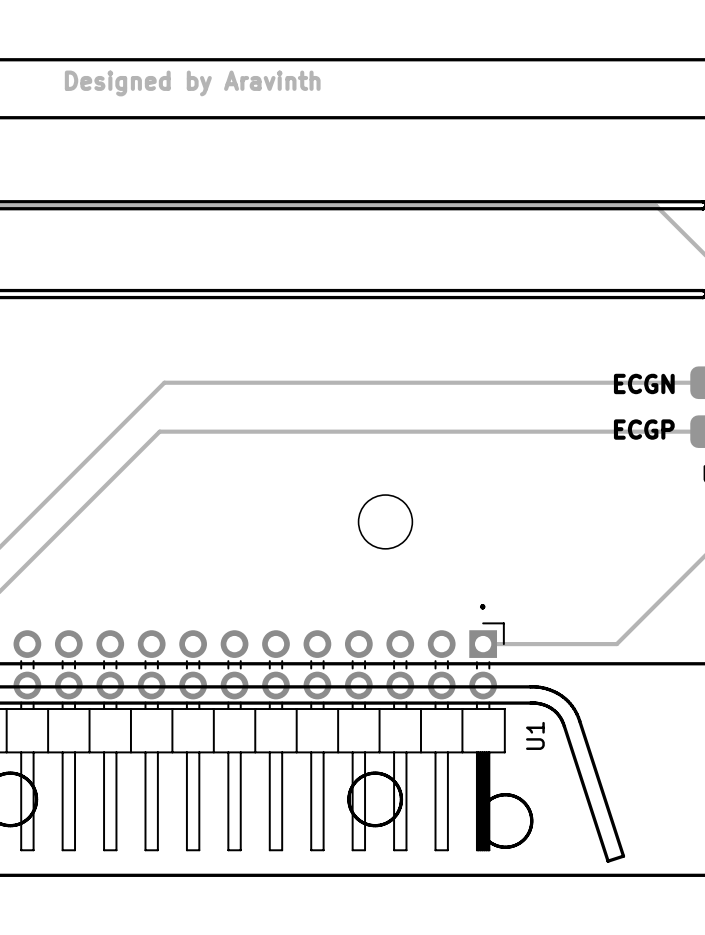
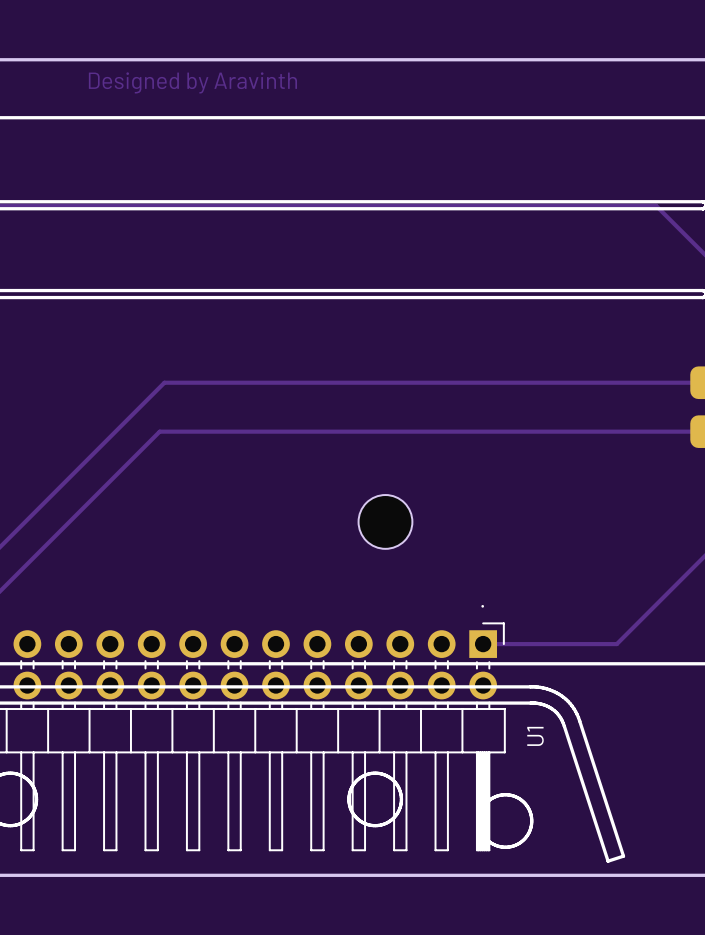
text: ECGN (644, 383) -> none
text: ECGP (644, 429) -> none

